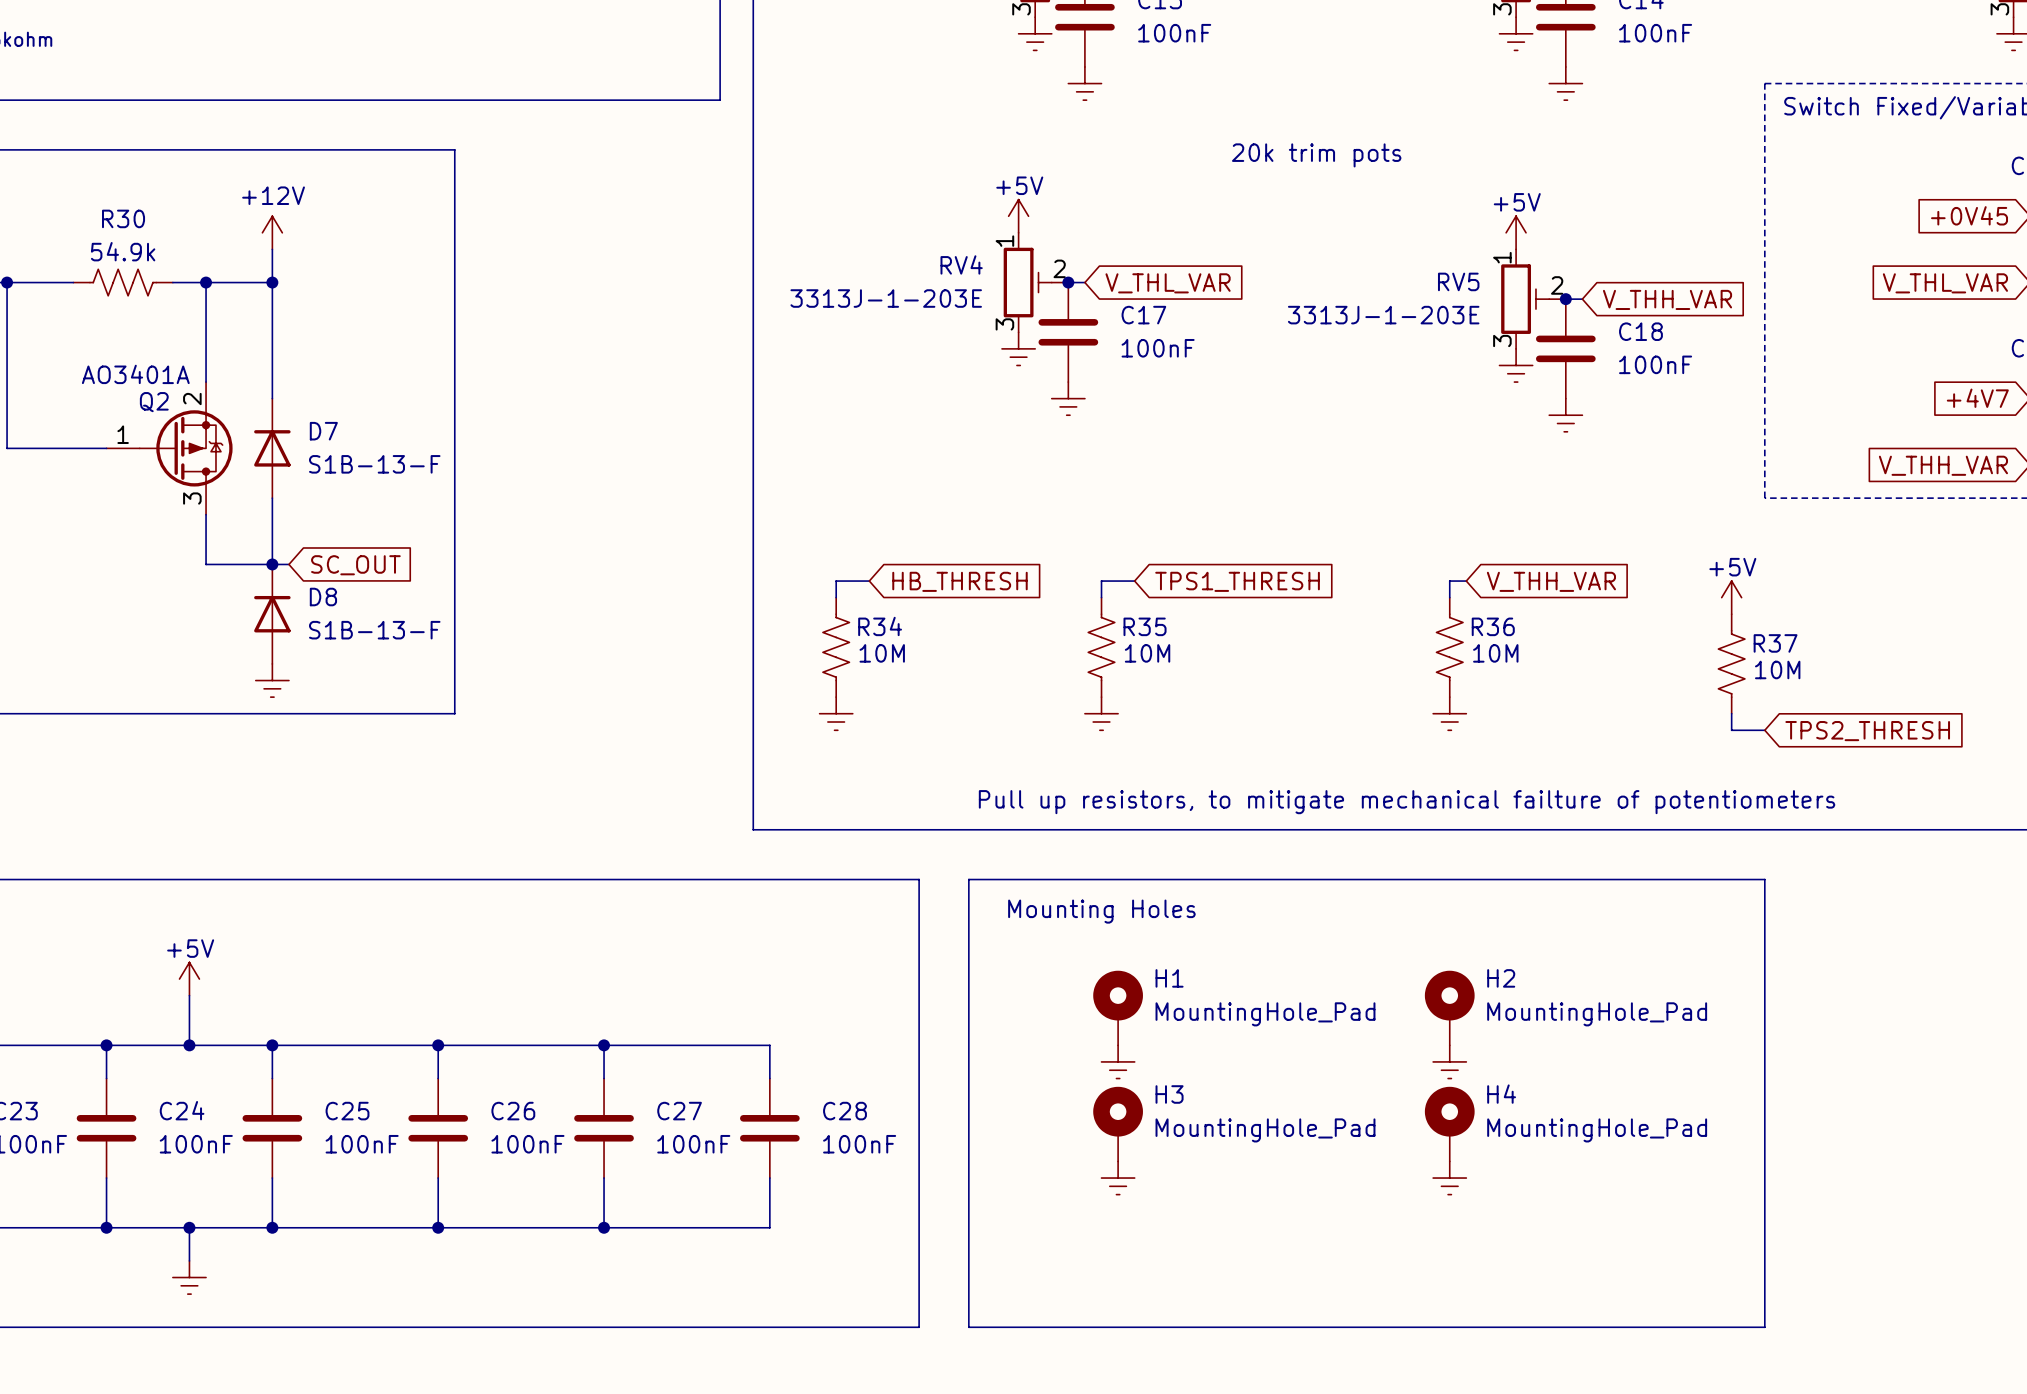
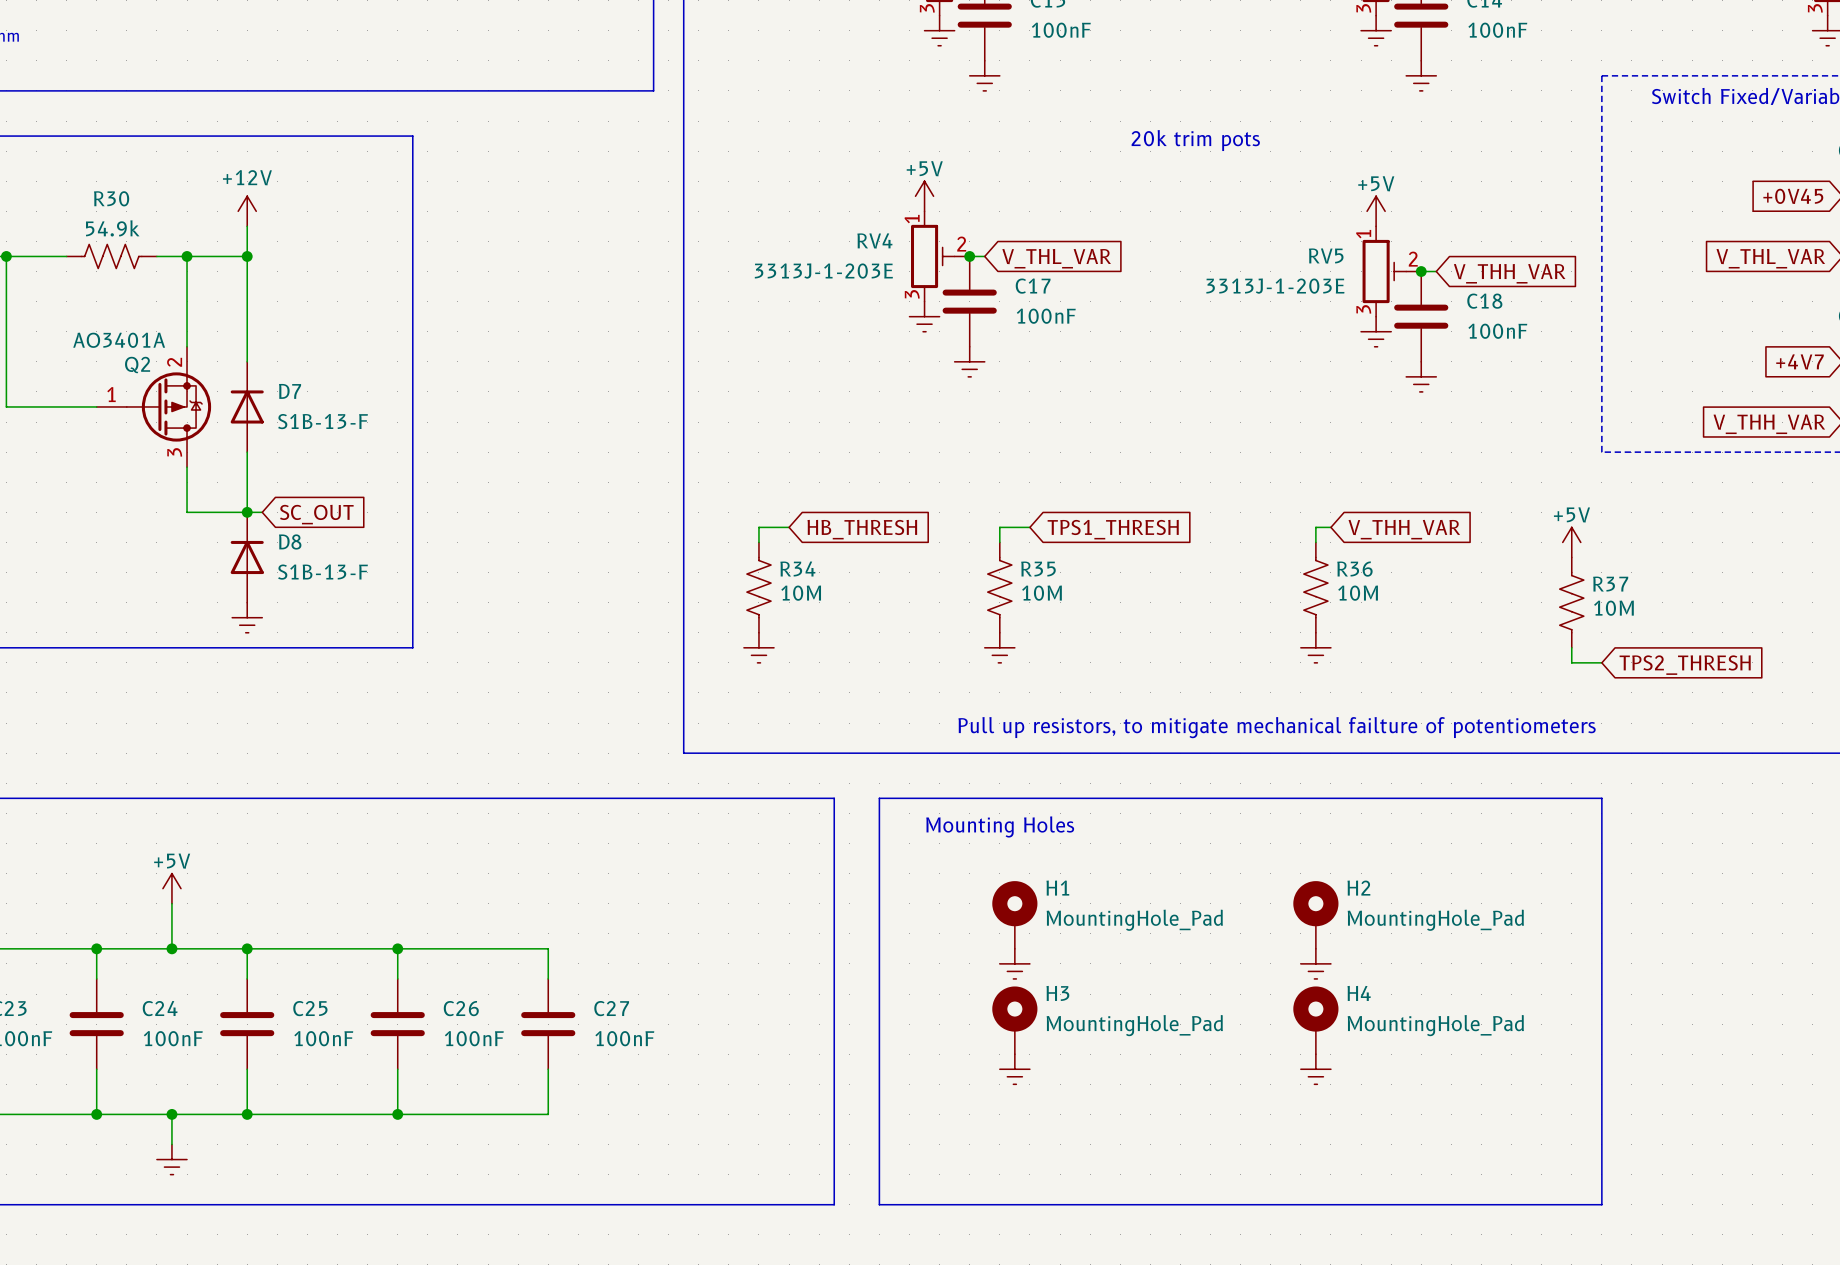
wire: (604, 1045) (769, 1045) (769, 1078) -> none
junction: (604, 1045) -> none
C28: 100nF (769, 1128) -> none
wire: (769, 1178) (769, 1227) (604, 1227) -> none
junction: (604, 1227) -> none

